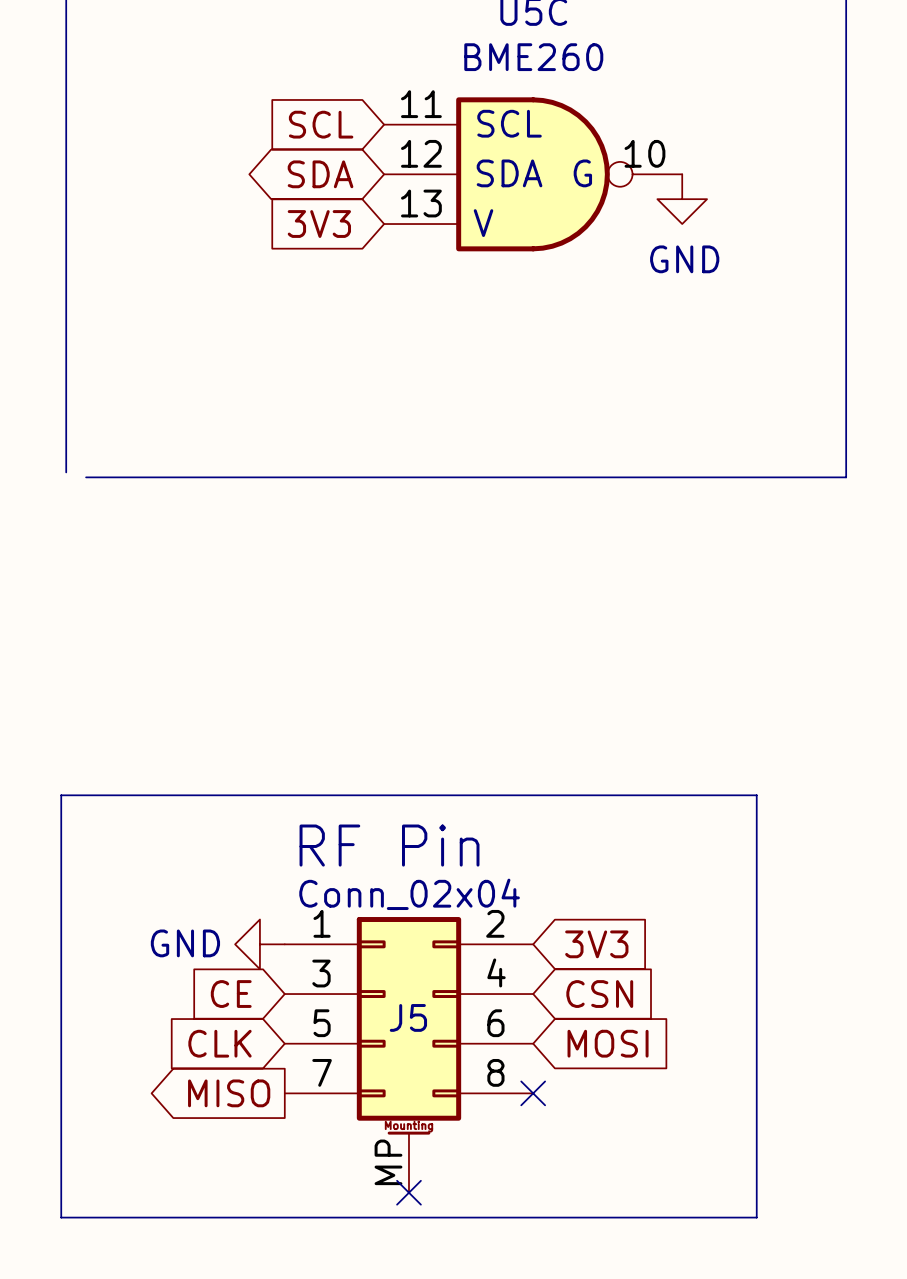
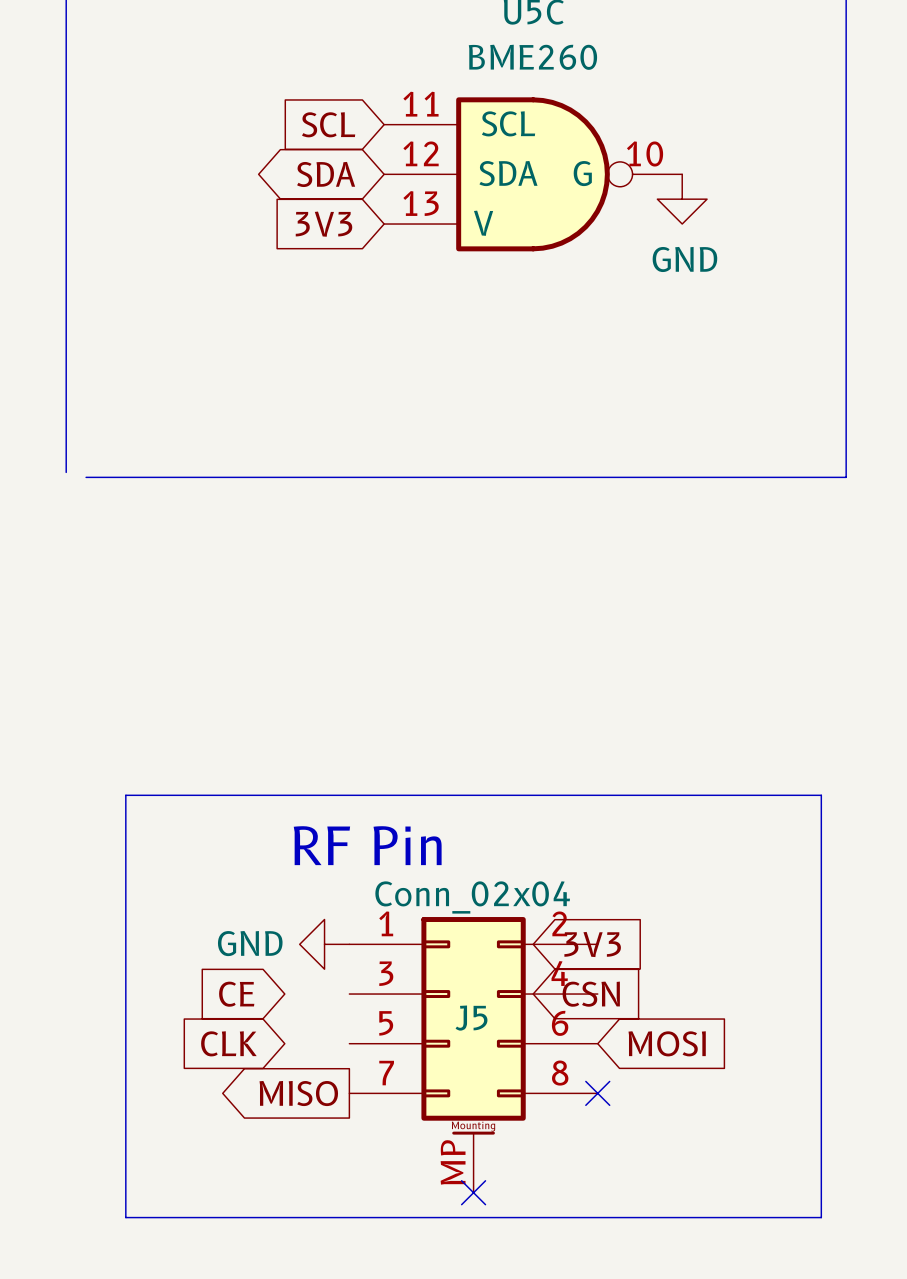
line: (125, 795) (61, 795) (61, 1217) (125, 1217) -> (125, 795) (125, 1217)
line: (756, 795) (756, 1217) -> (756, 795) (821, 795) (821, 1217) (756, 1217)
power symbol position: GND (259, 944) -> GND (324, 944)
global label position: MOSI (608, 1043) -> MOSI (667, 1043)
J5 position: (408, 1054) -> (473, 1054)
global label position: MISO (229, 1093) -> MISO (298, 1093)
no-connect mark: (533, 1093) -> none
no-connect mark: none -> (597, 1093)
no-connect mark: (408, 1192) -> none
no-connect mark: none -> (473, 1192)

